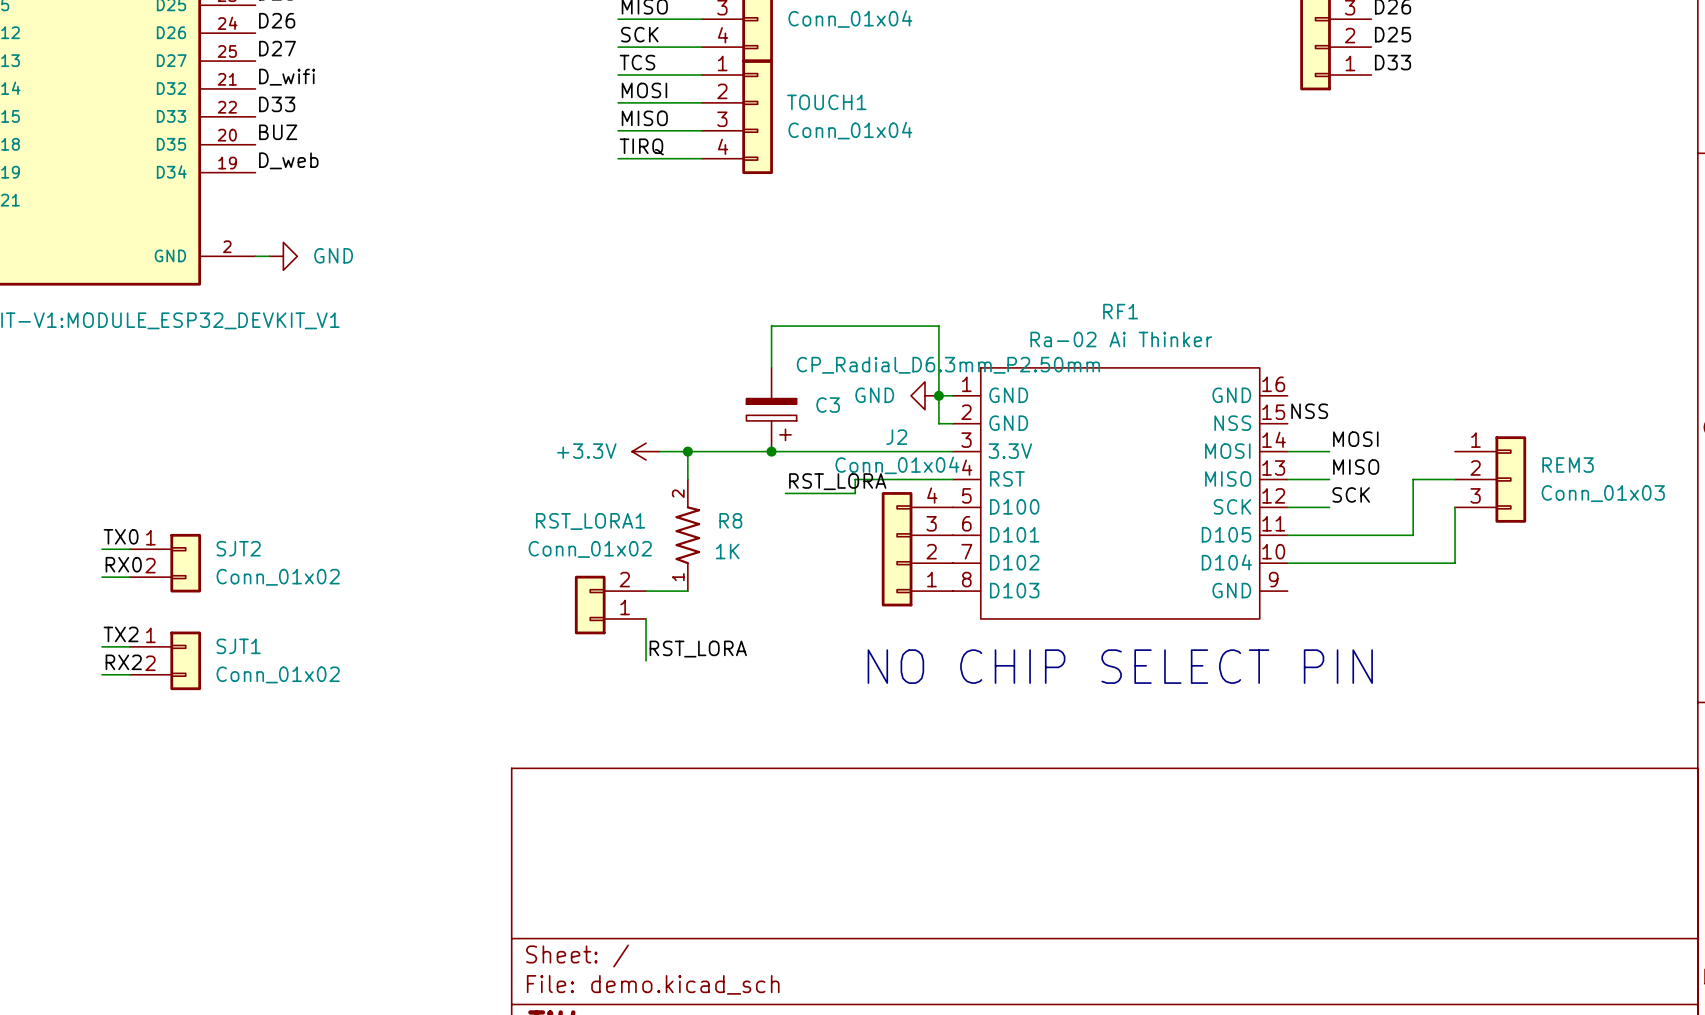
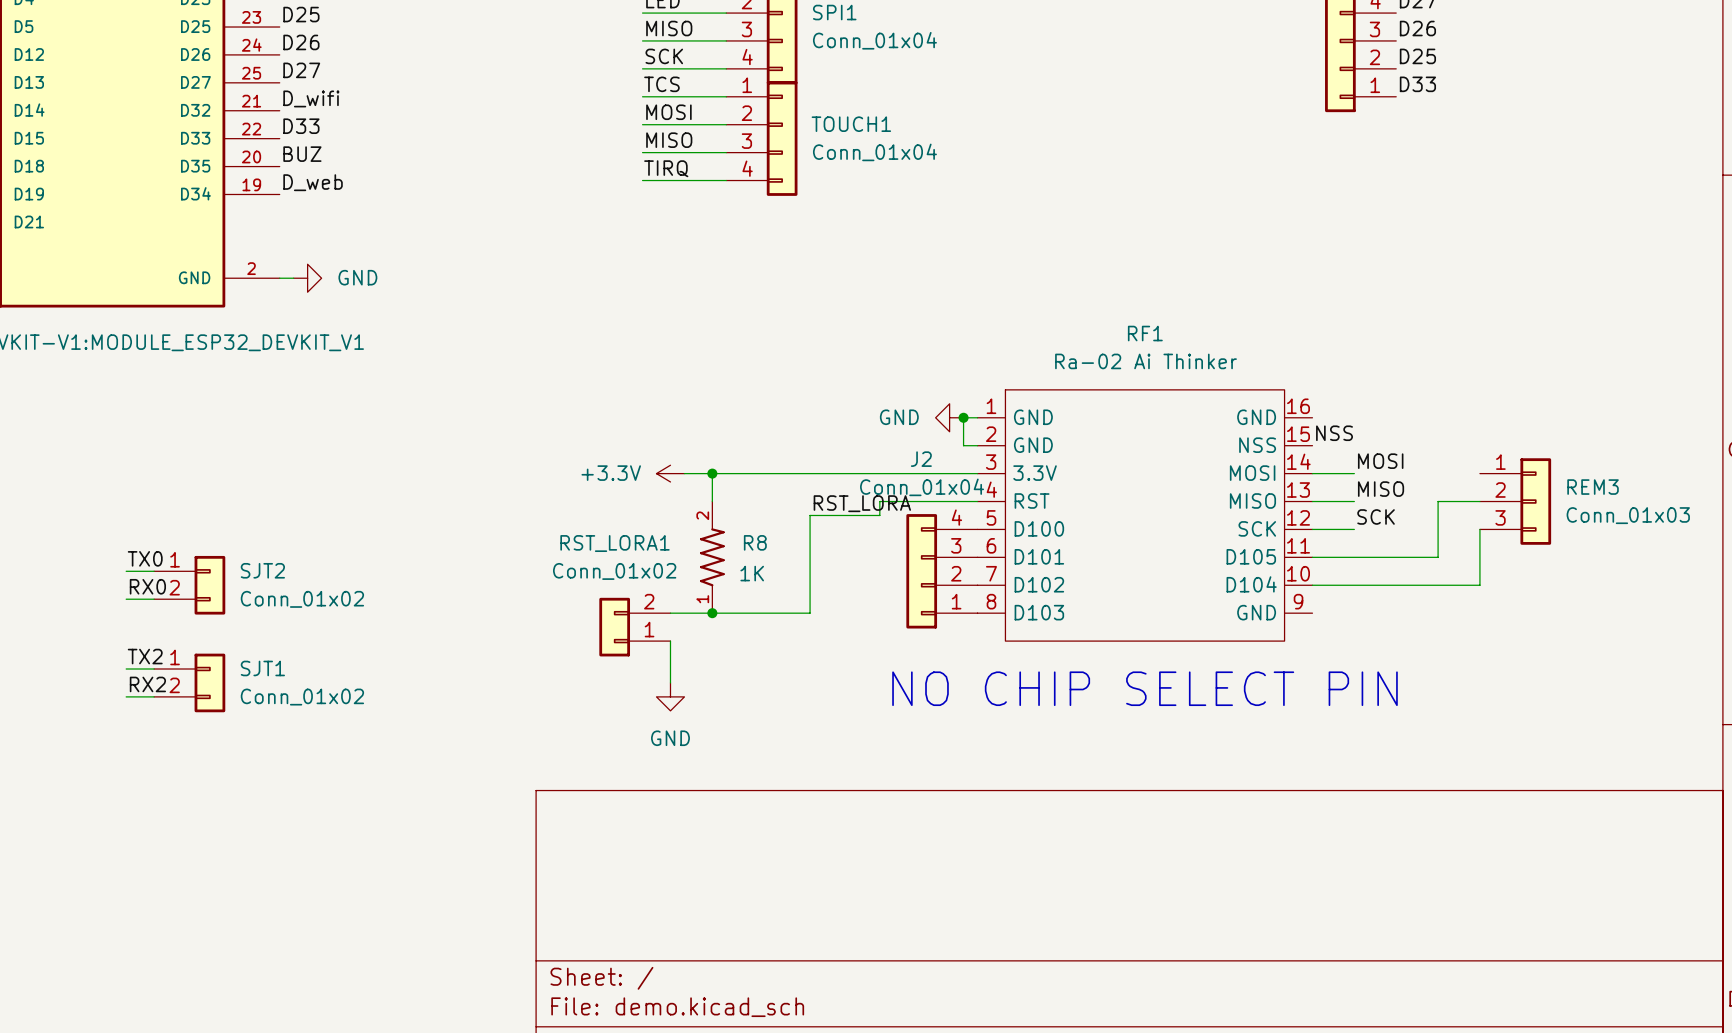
wire: (771, 367) (771, 326) (938, 326) (938, 395) -> none
C3: CP_Radial_D6.3mm_P2.50mm (771, 409) -> none
junction: (771, 451) -> none
wire: none -> (810, 515) (810, 613) (712, 613)
junction: none -> (712, 613)
label: RST_LORA (698, 649) -> none
power symbol: none -> GND (670, 696)

